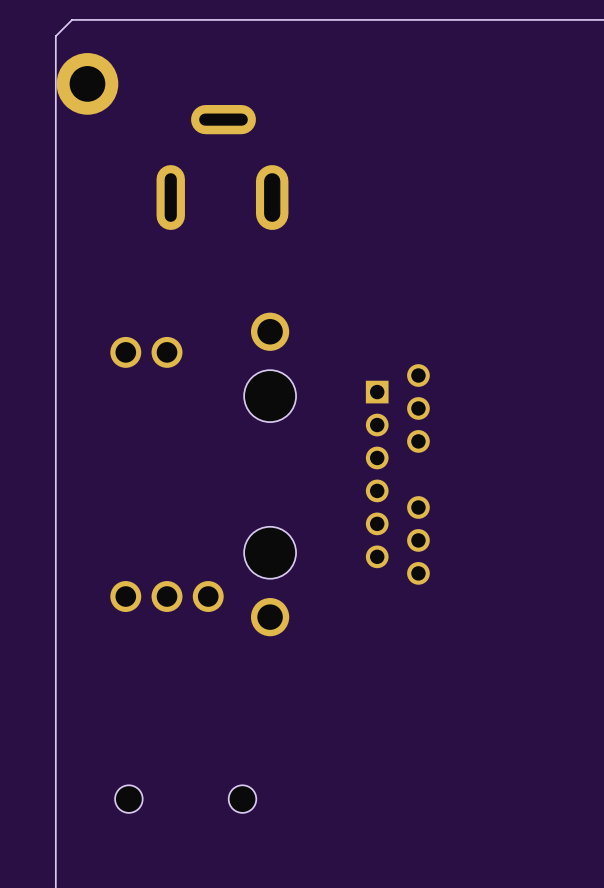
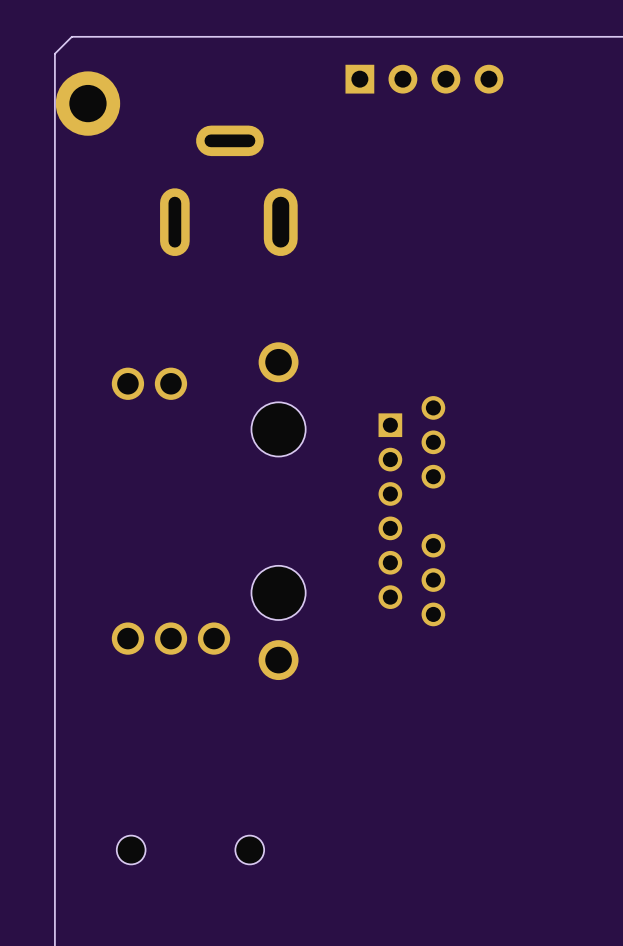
part: none -> (424, 79)

